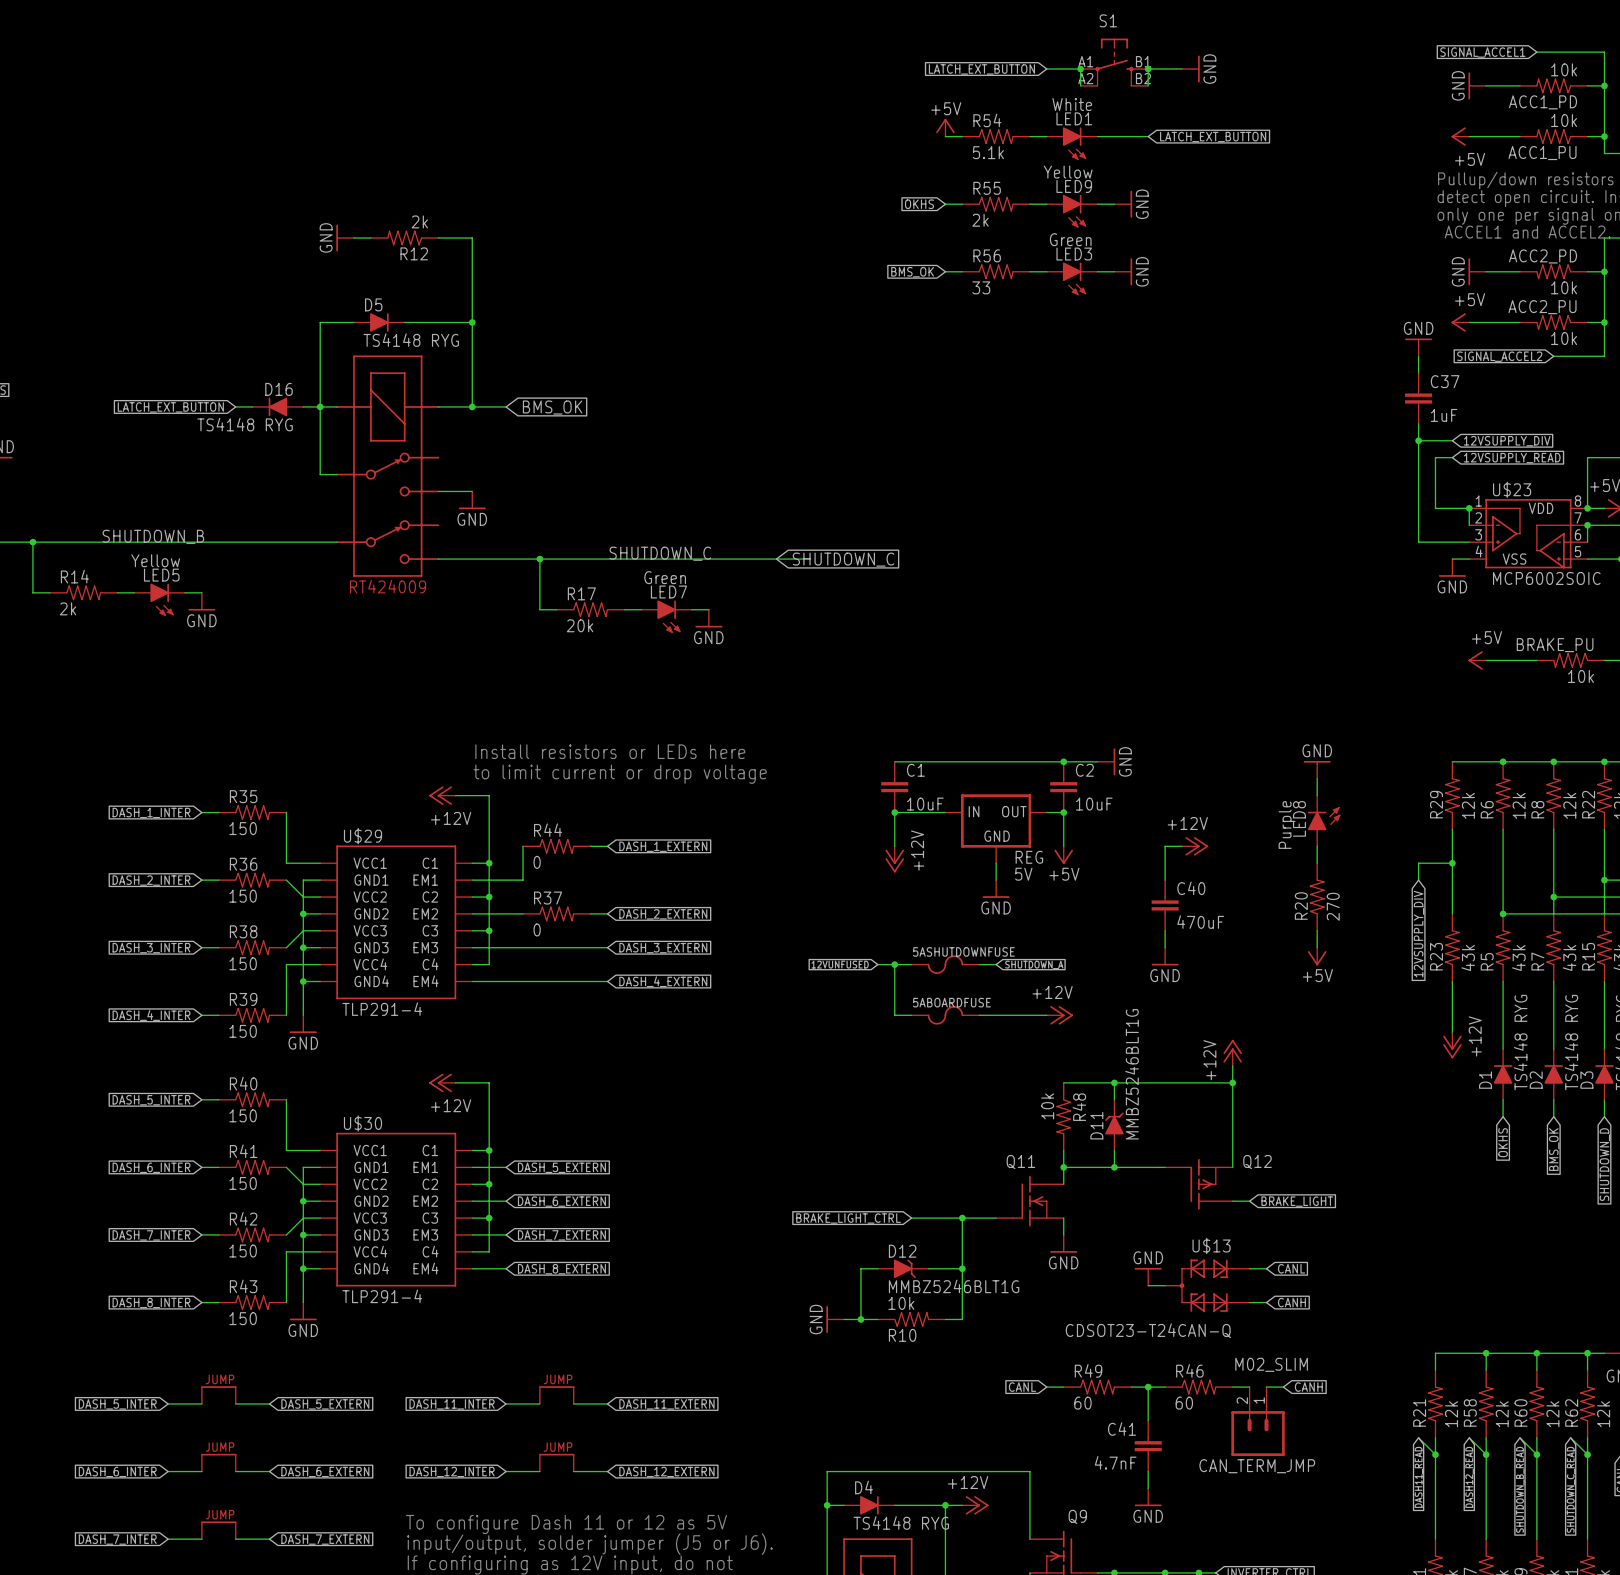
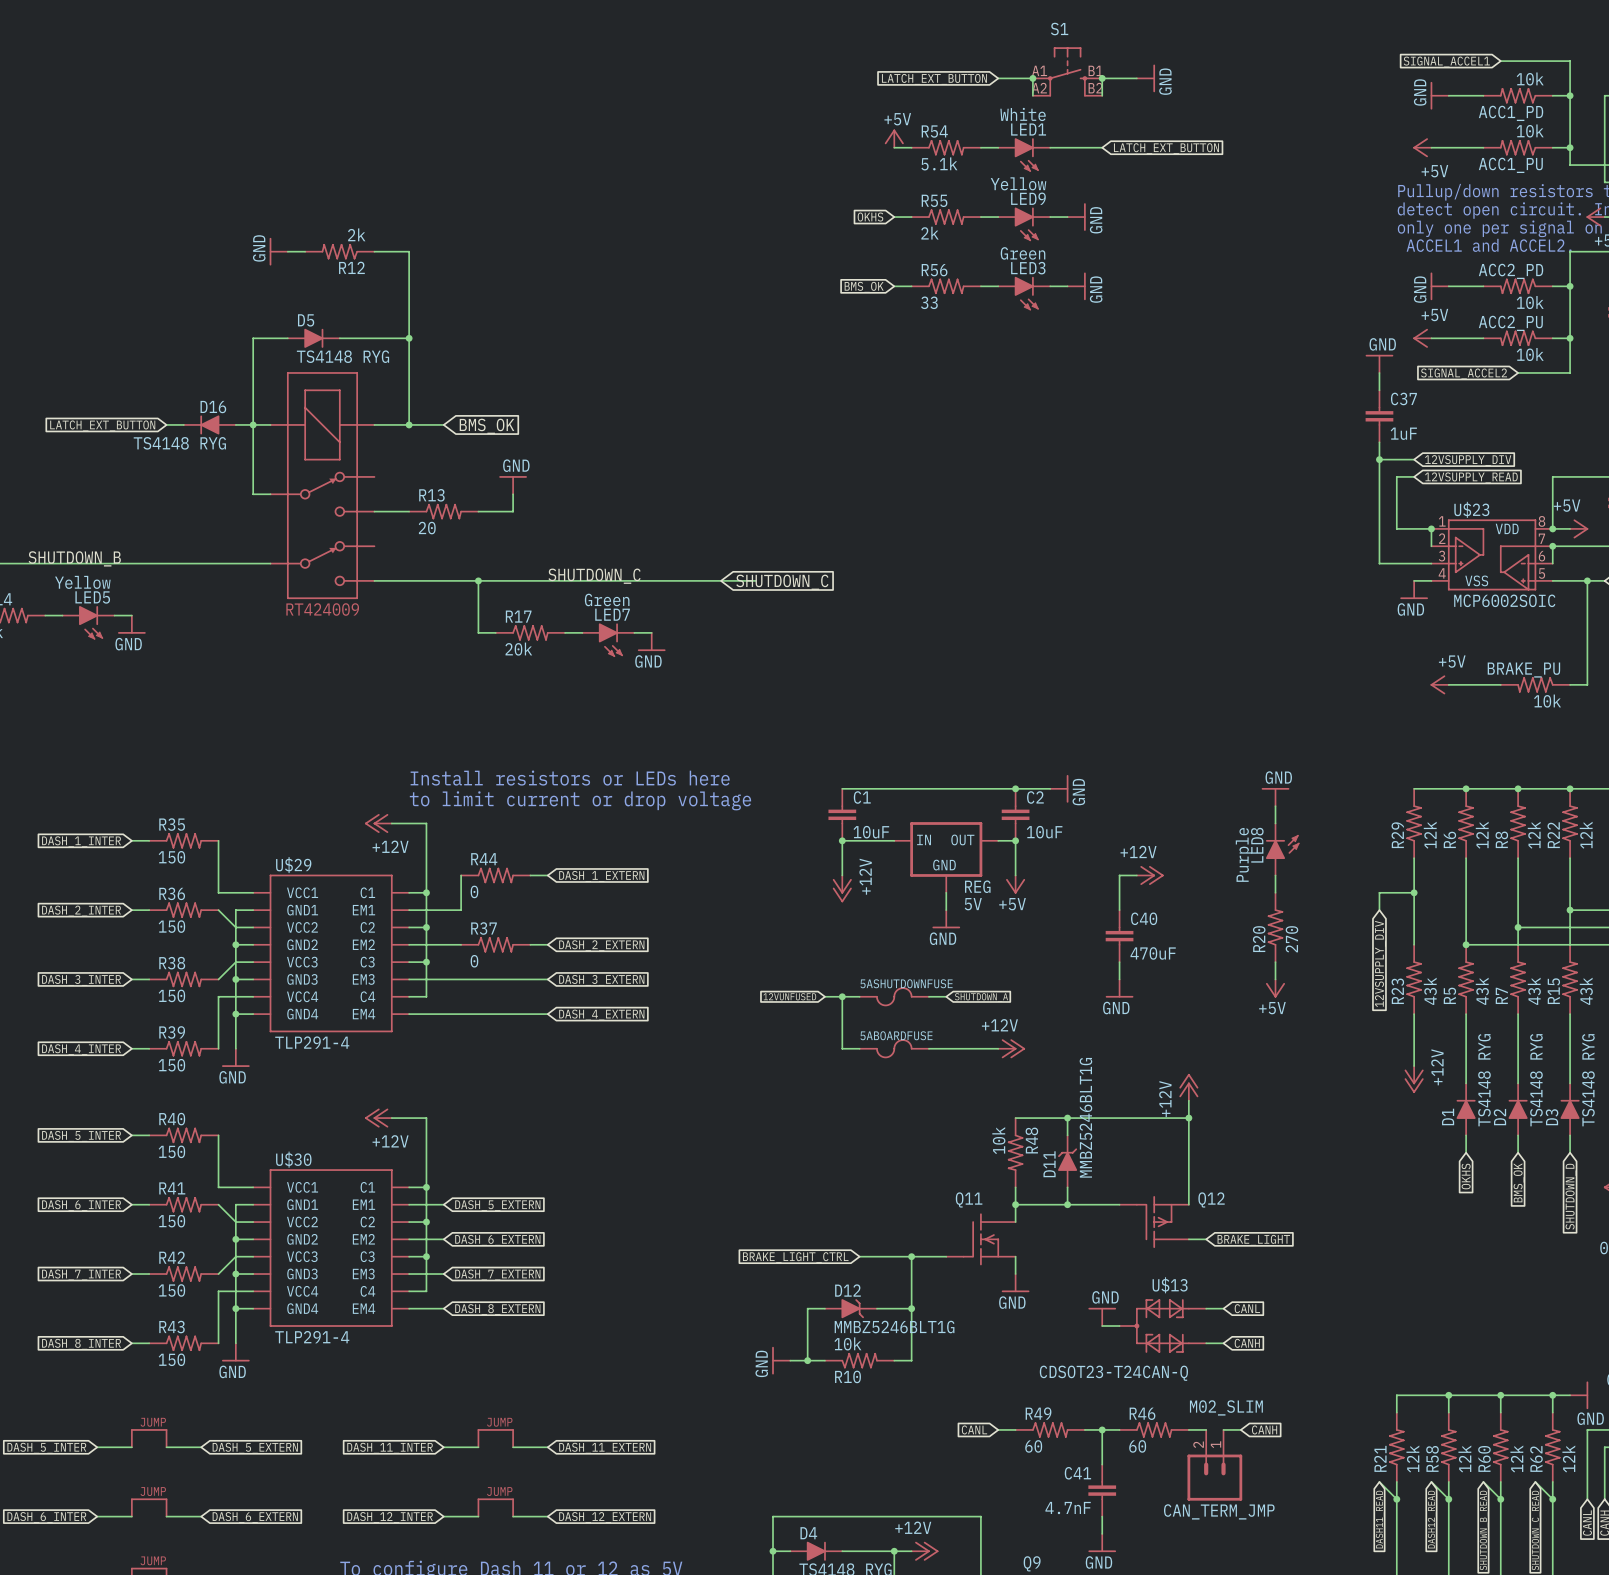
wire: none -> (513, 494) (513, 511) (478, 511)
R13: none -> 20 (443, 511)
power symbol position: GND (472, 500) -> GND (513, 485)
power symbol rotation: 0° (472, 508) -> 180° (513, 476)

